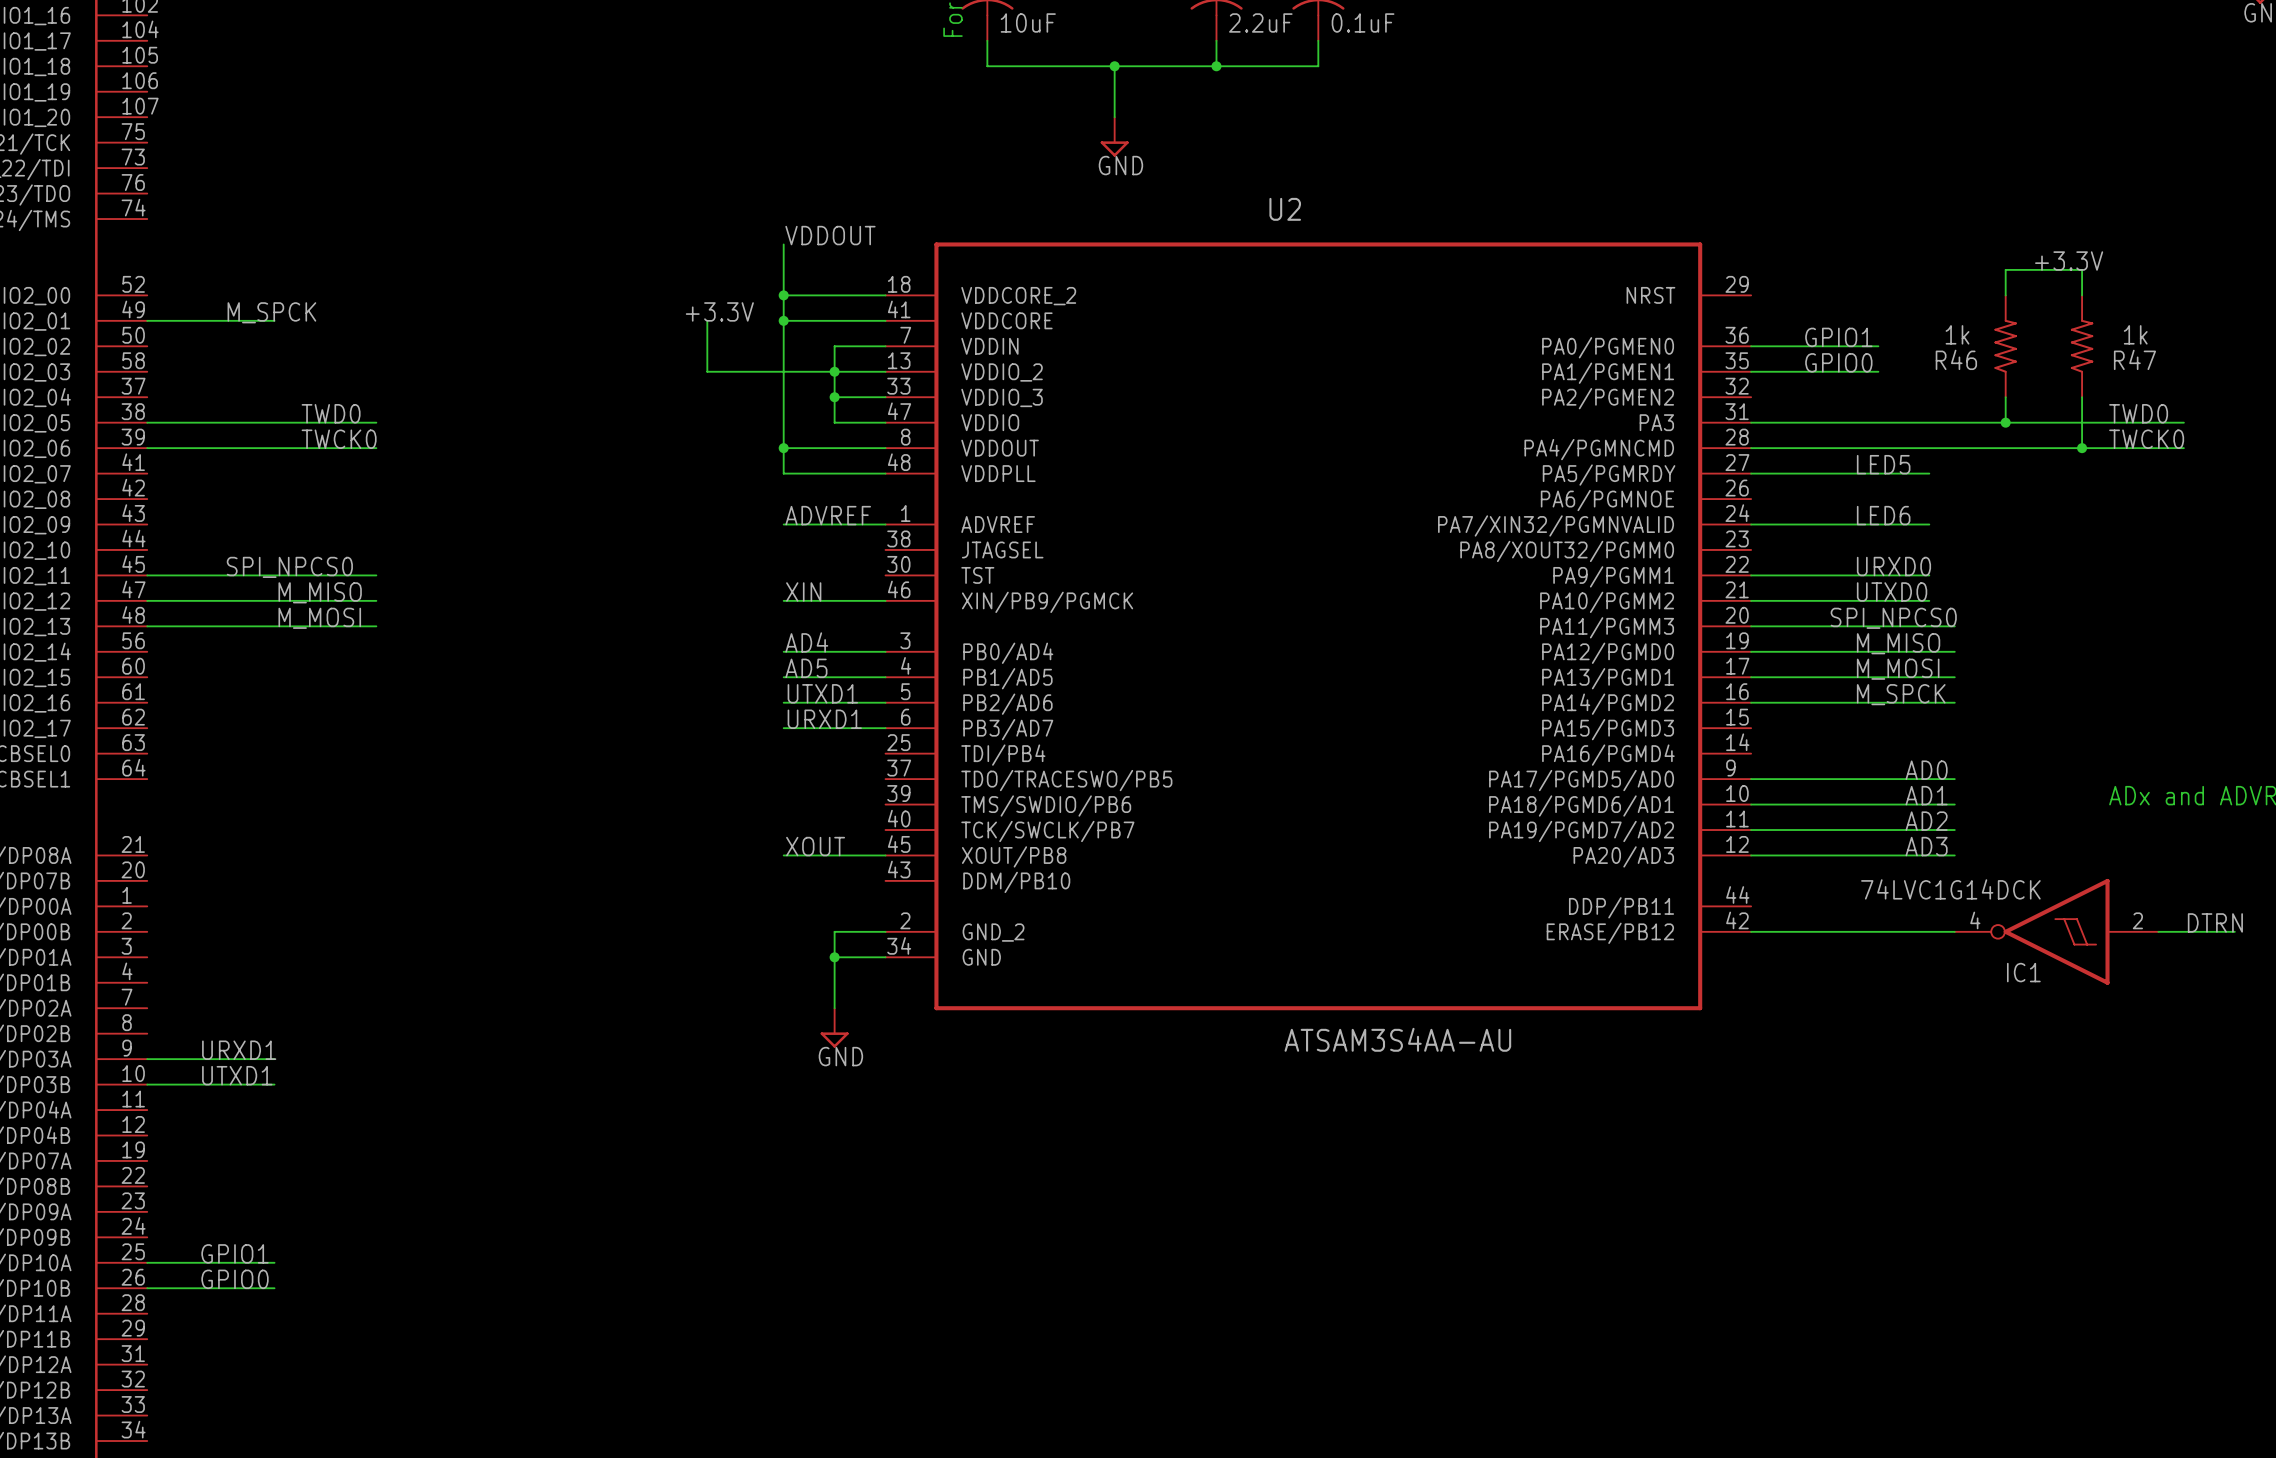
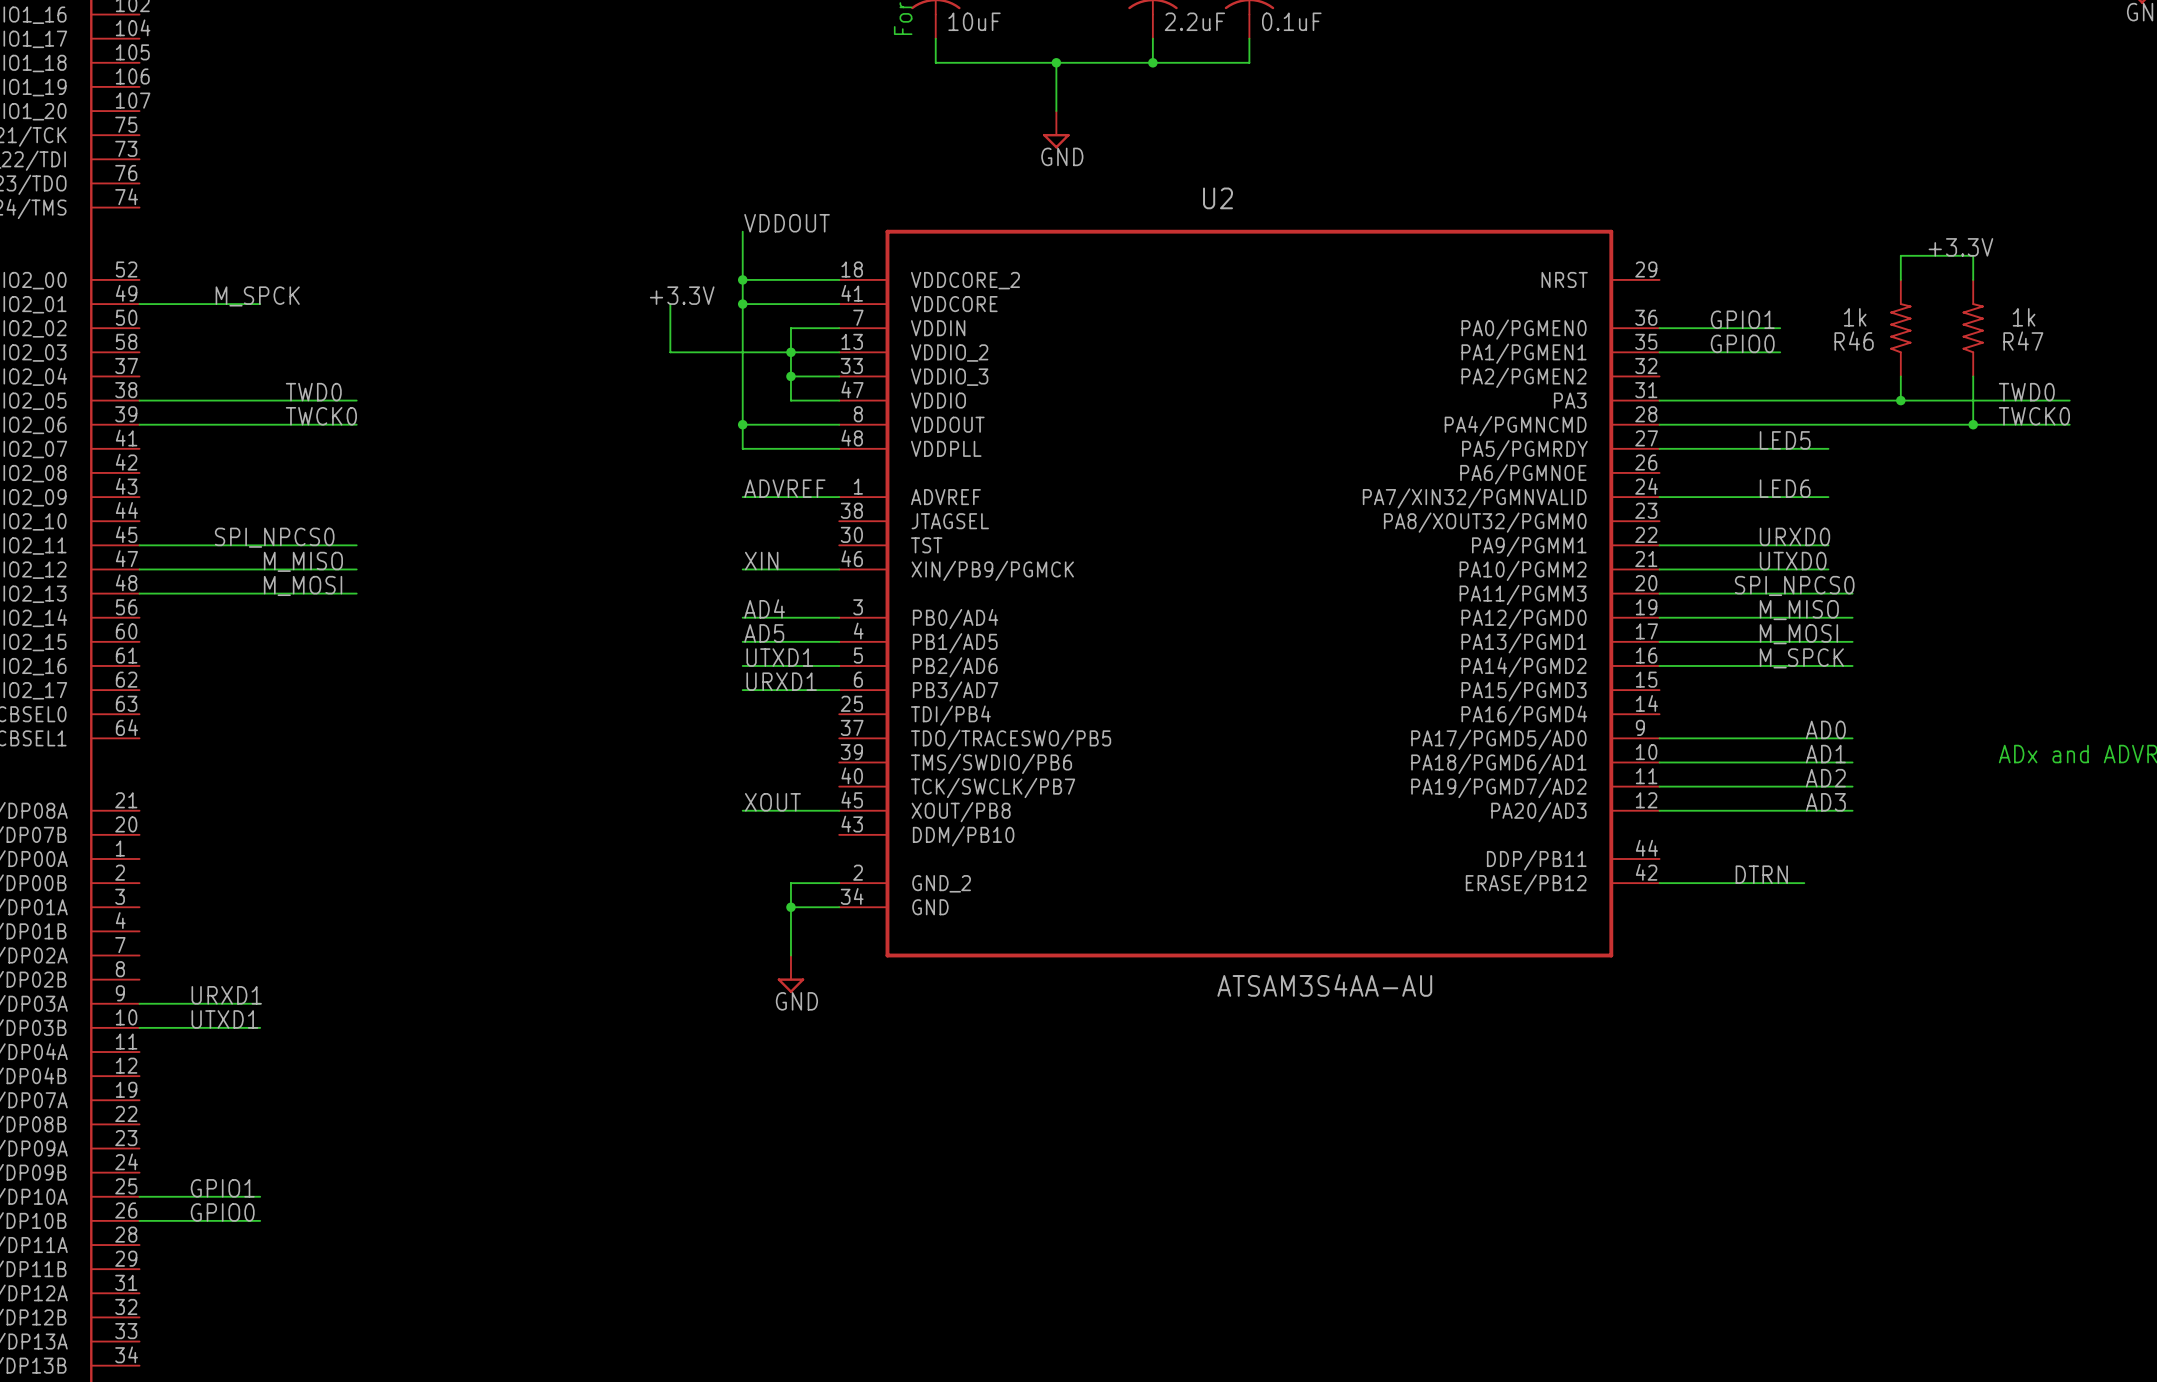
label: none -> DTRN (1761, 874)
label: DTRN (2215, 922) -> none
wire: (1903, 931) (1954, 931) -> none
IC1: 74LVC1G14DCK (2056, 931) -> none
wire: (2158, 931) (2234, 931) -> none

